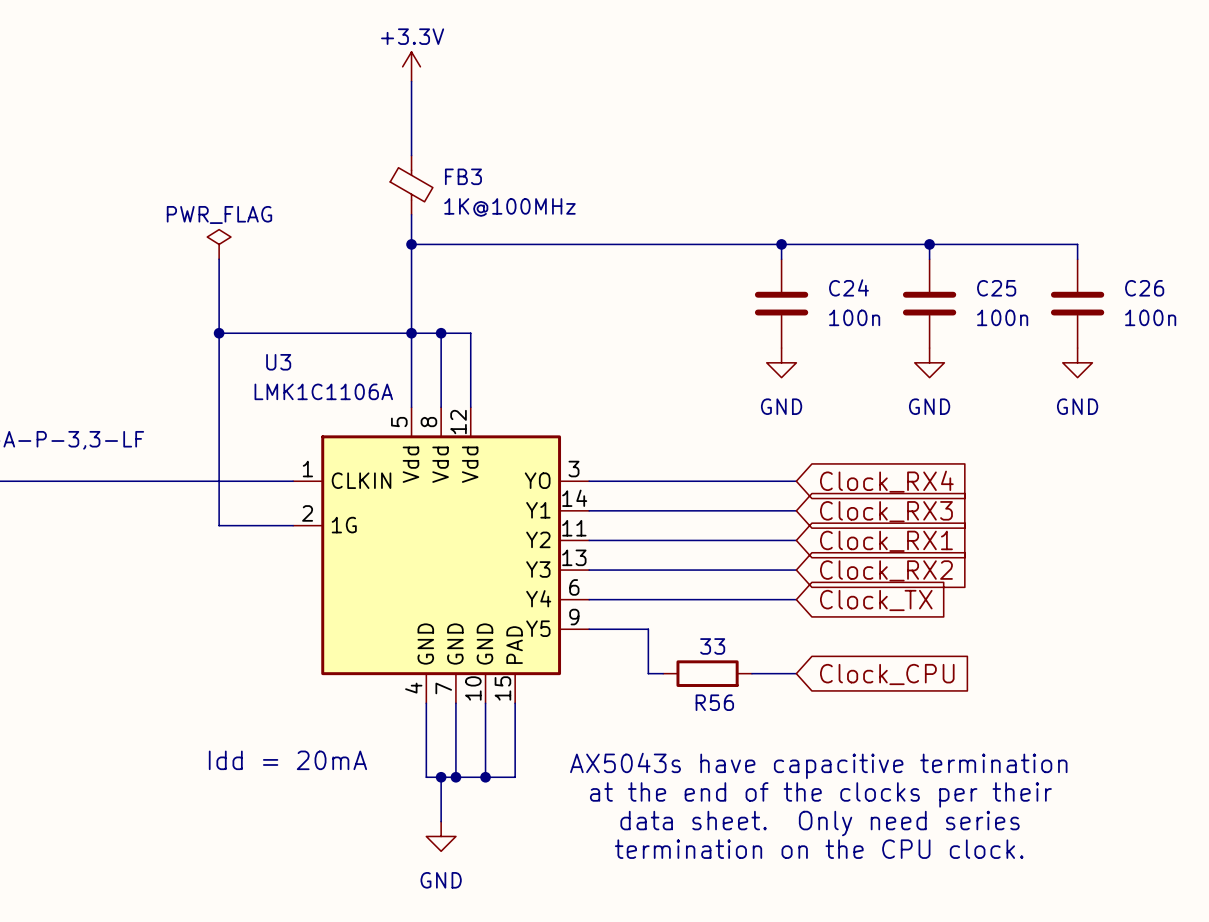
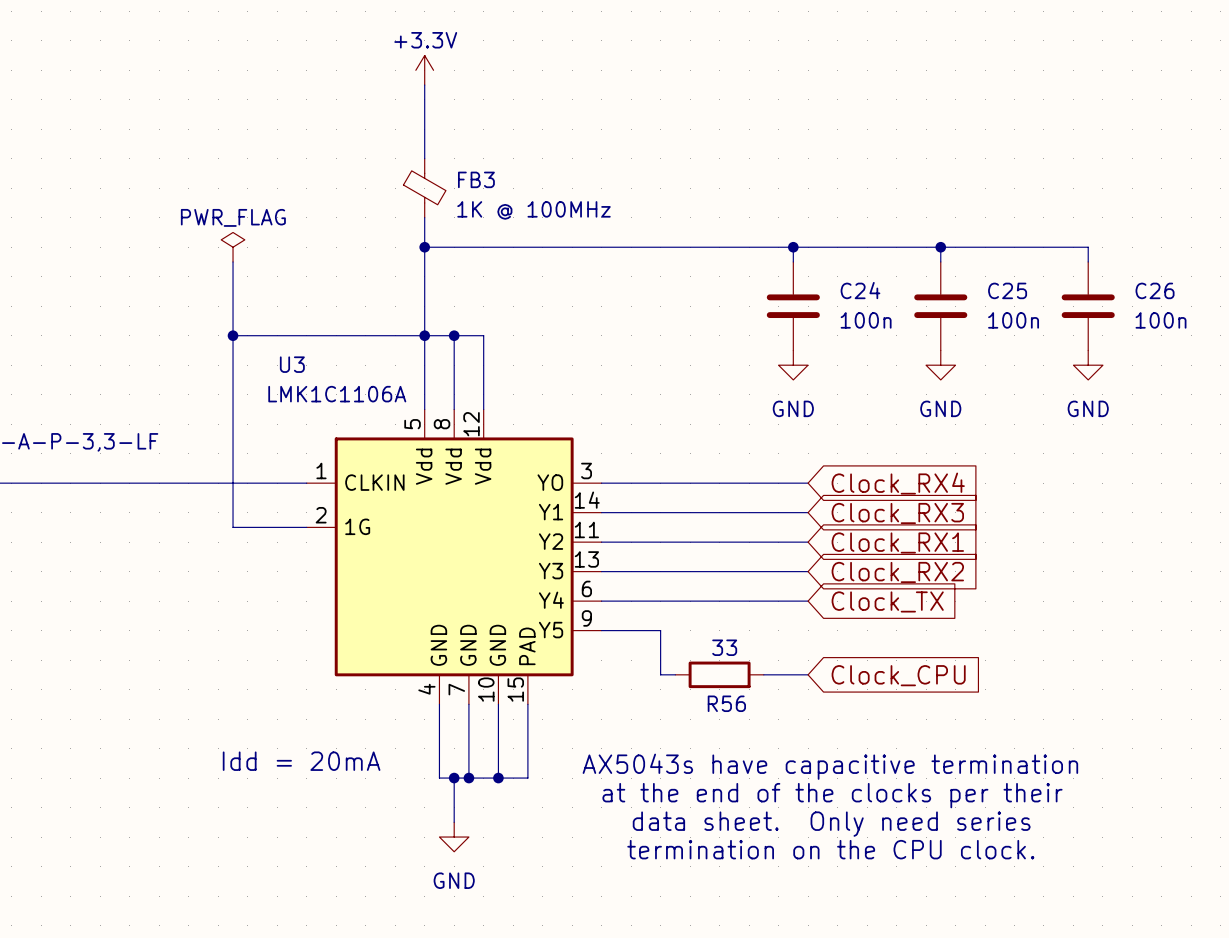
FB3 value: 1K@100MHz (509, 207) -> 1K @ 100MHz (533, 210)

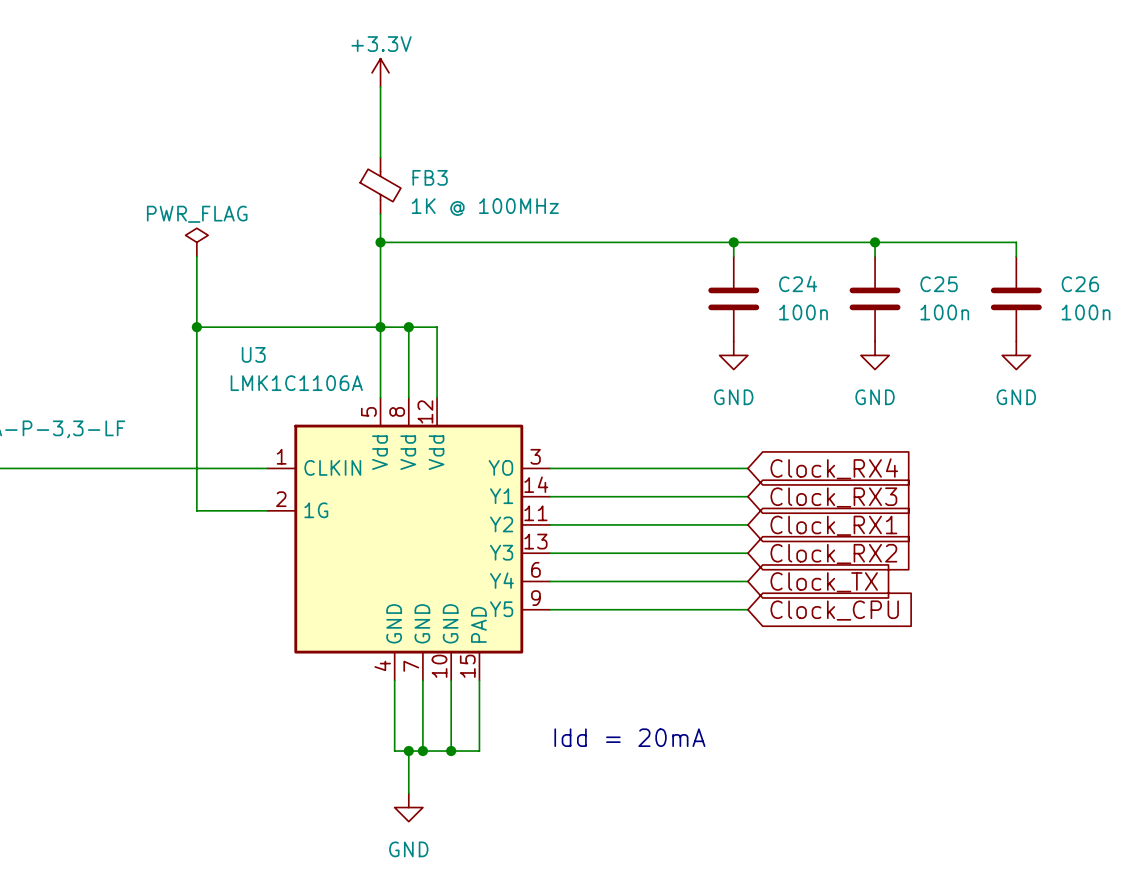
wire: (660, 630) (660, 674) (675, 674) -> (606, 609) (747, 609)
R56: 33 (719, 674) -> none
wire: (763, 674) (808, 674) -> none
global label position: Clock_CPU (898, 675) -> Clock_CPU (834, 610)
text: Idd = 20mA (301, 761) -> none
text: none -> Idd = 20mA (629, 737)
text: AX5043s have capacitive termination (830, 766) -> none
text: at the end of the clocks per their (832, 795) -> none
text: data sheet. Only need series (831, 824) -> none
text: termination on the CPU clock. (830, 849) -> none

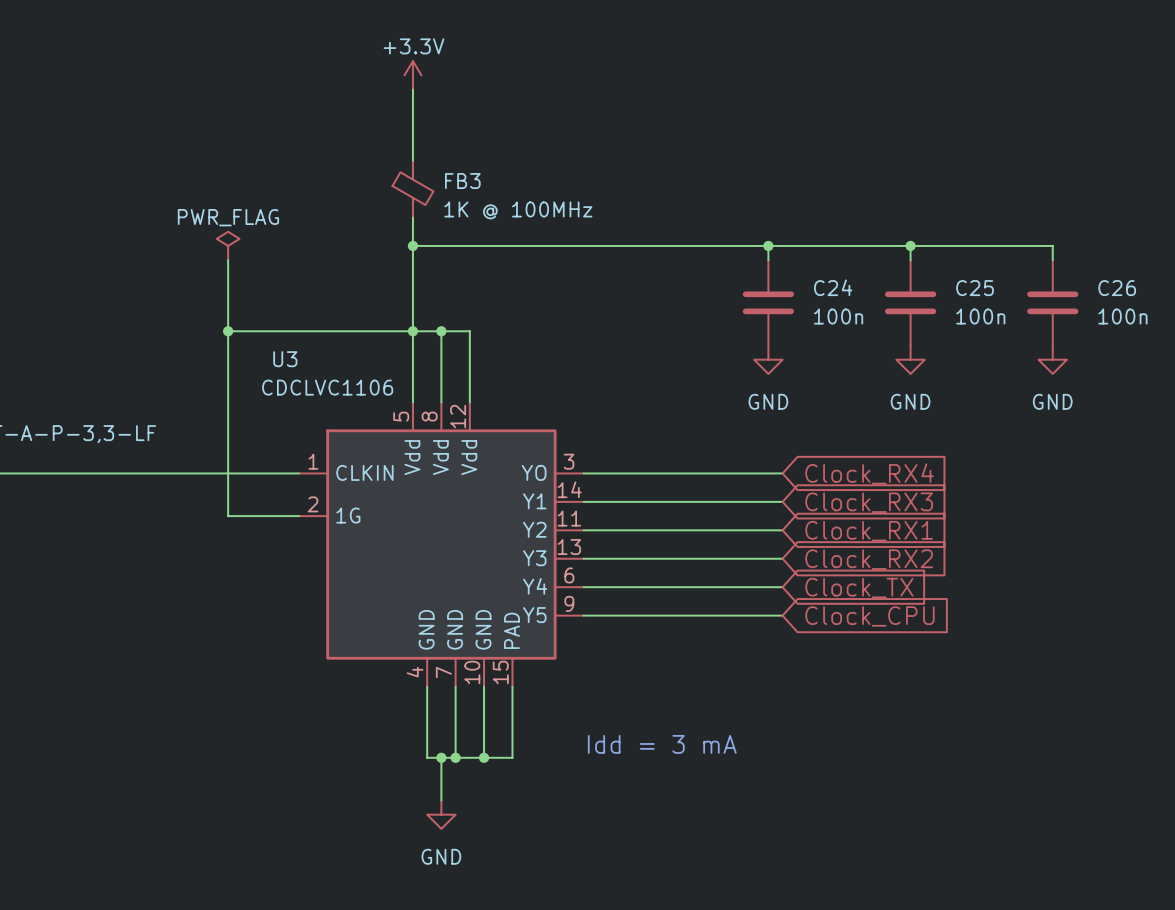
U3 value: LMK1C1106A (296, 383) -> CDCLVC1106 (327, 387)
text: Idd = 20mA (629, 737) -> Idd = 3 mA (662, 744)

